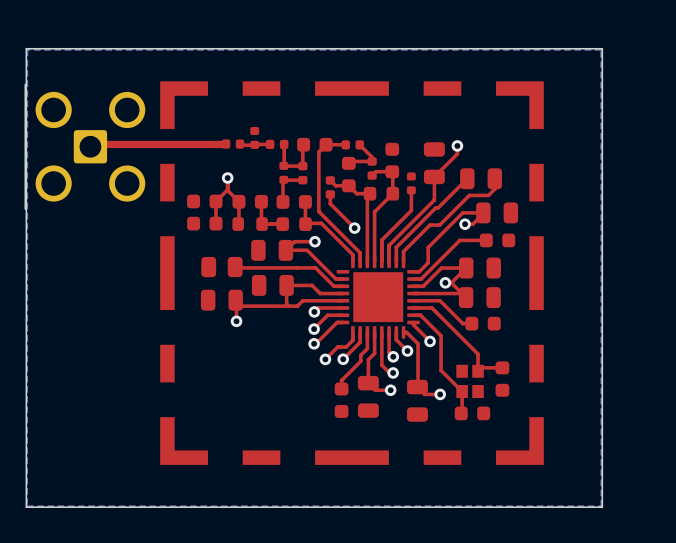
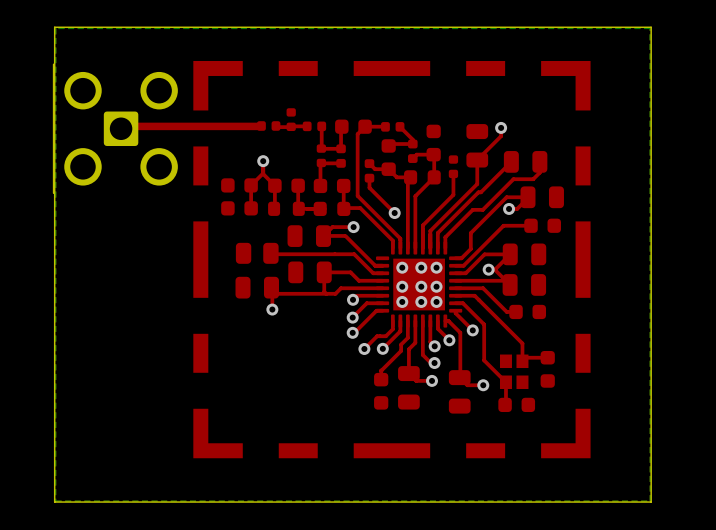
via: none -> (402, 267)
via: none -> (421, 267)
via: none -> (436, 267)
via: none -> (402, 286)
via: none -> (421, 286)
via: none -> (436, 286)
via: none -> (402, 301)
via: none -> (421, 301)
via: none -> (436, 301)

